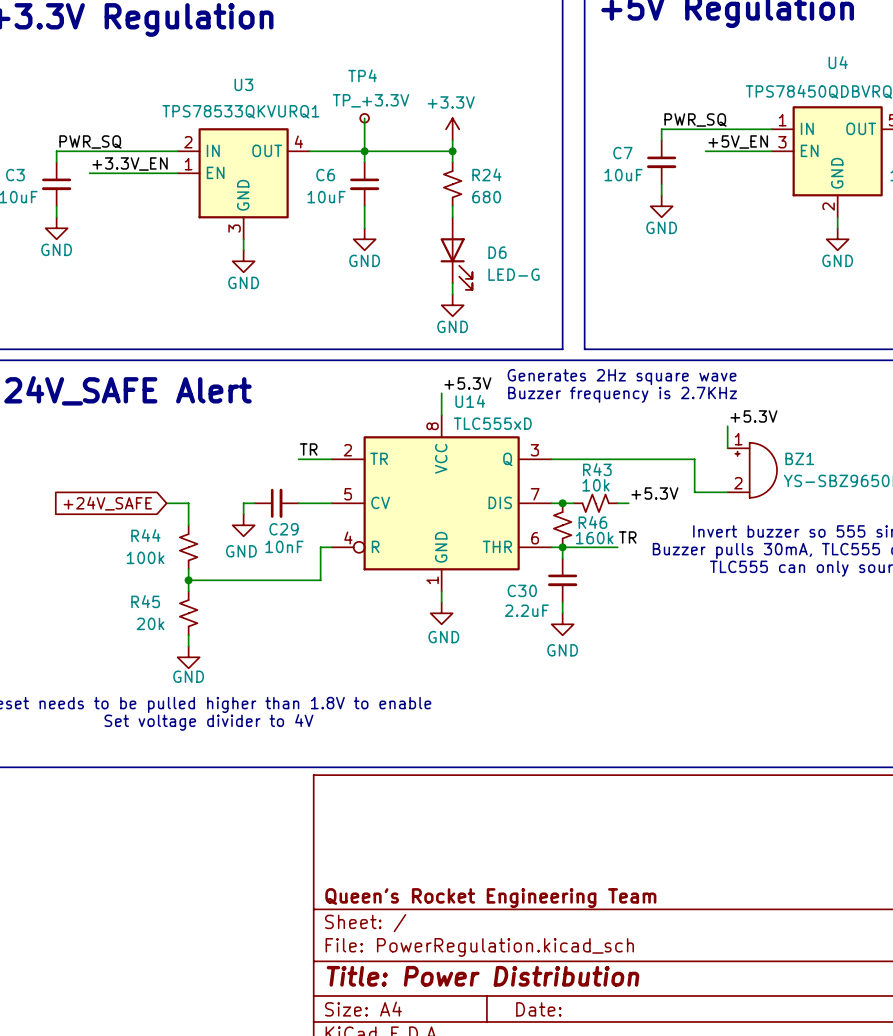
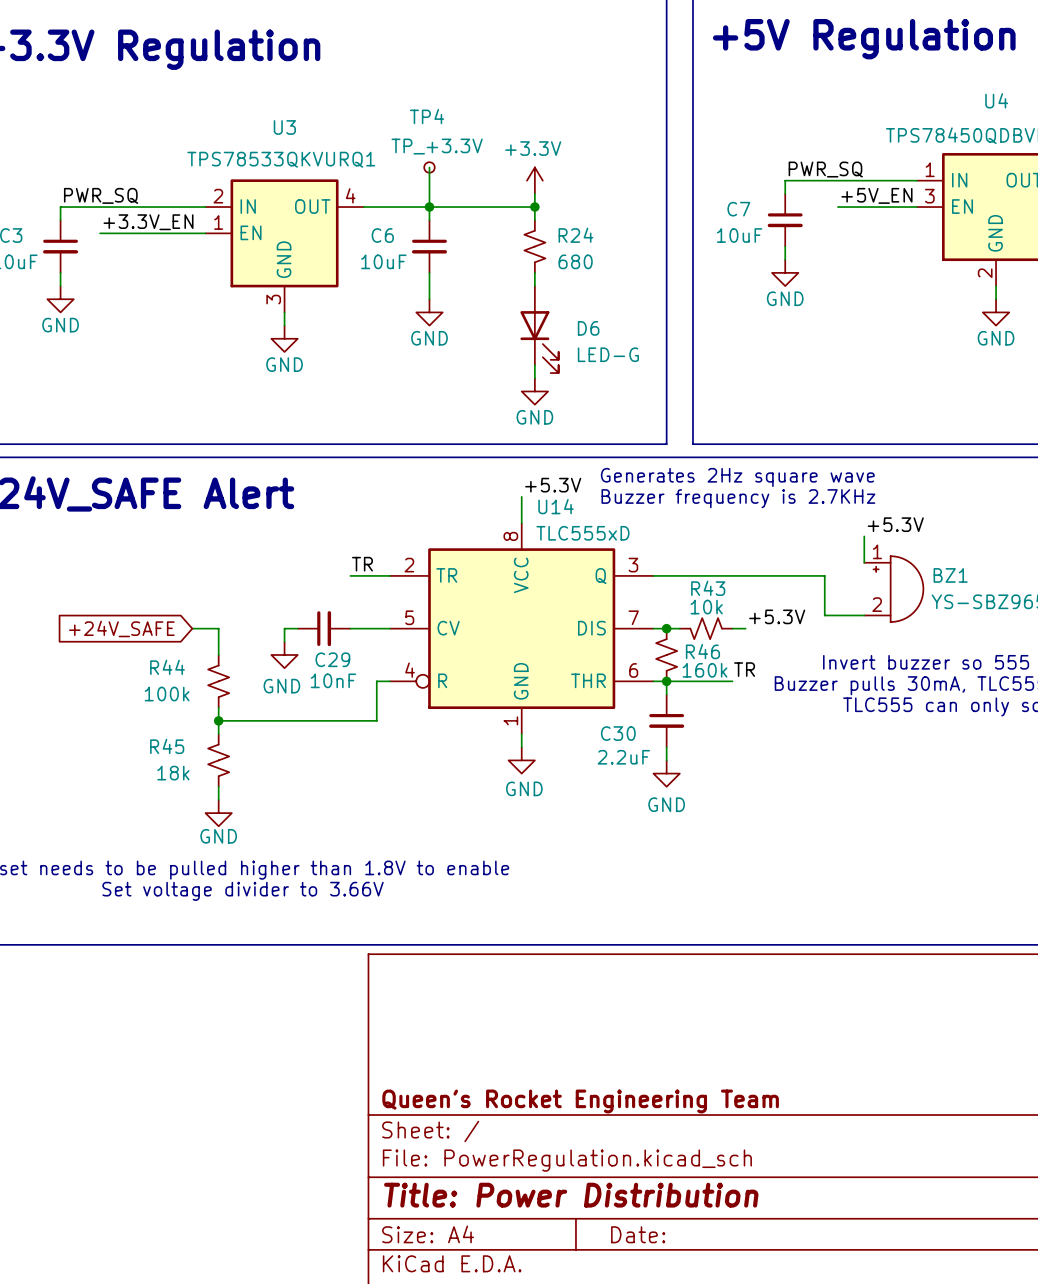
R45 value: 20k (150, 623) -> 18k (173, 773)
text: Set voltage divider to 4V (208, 722) -> Set voltage divider to 3.66V (243, 891)

